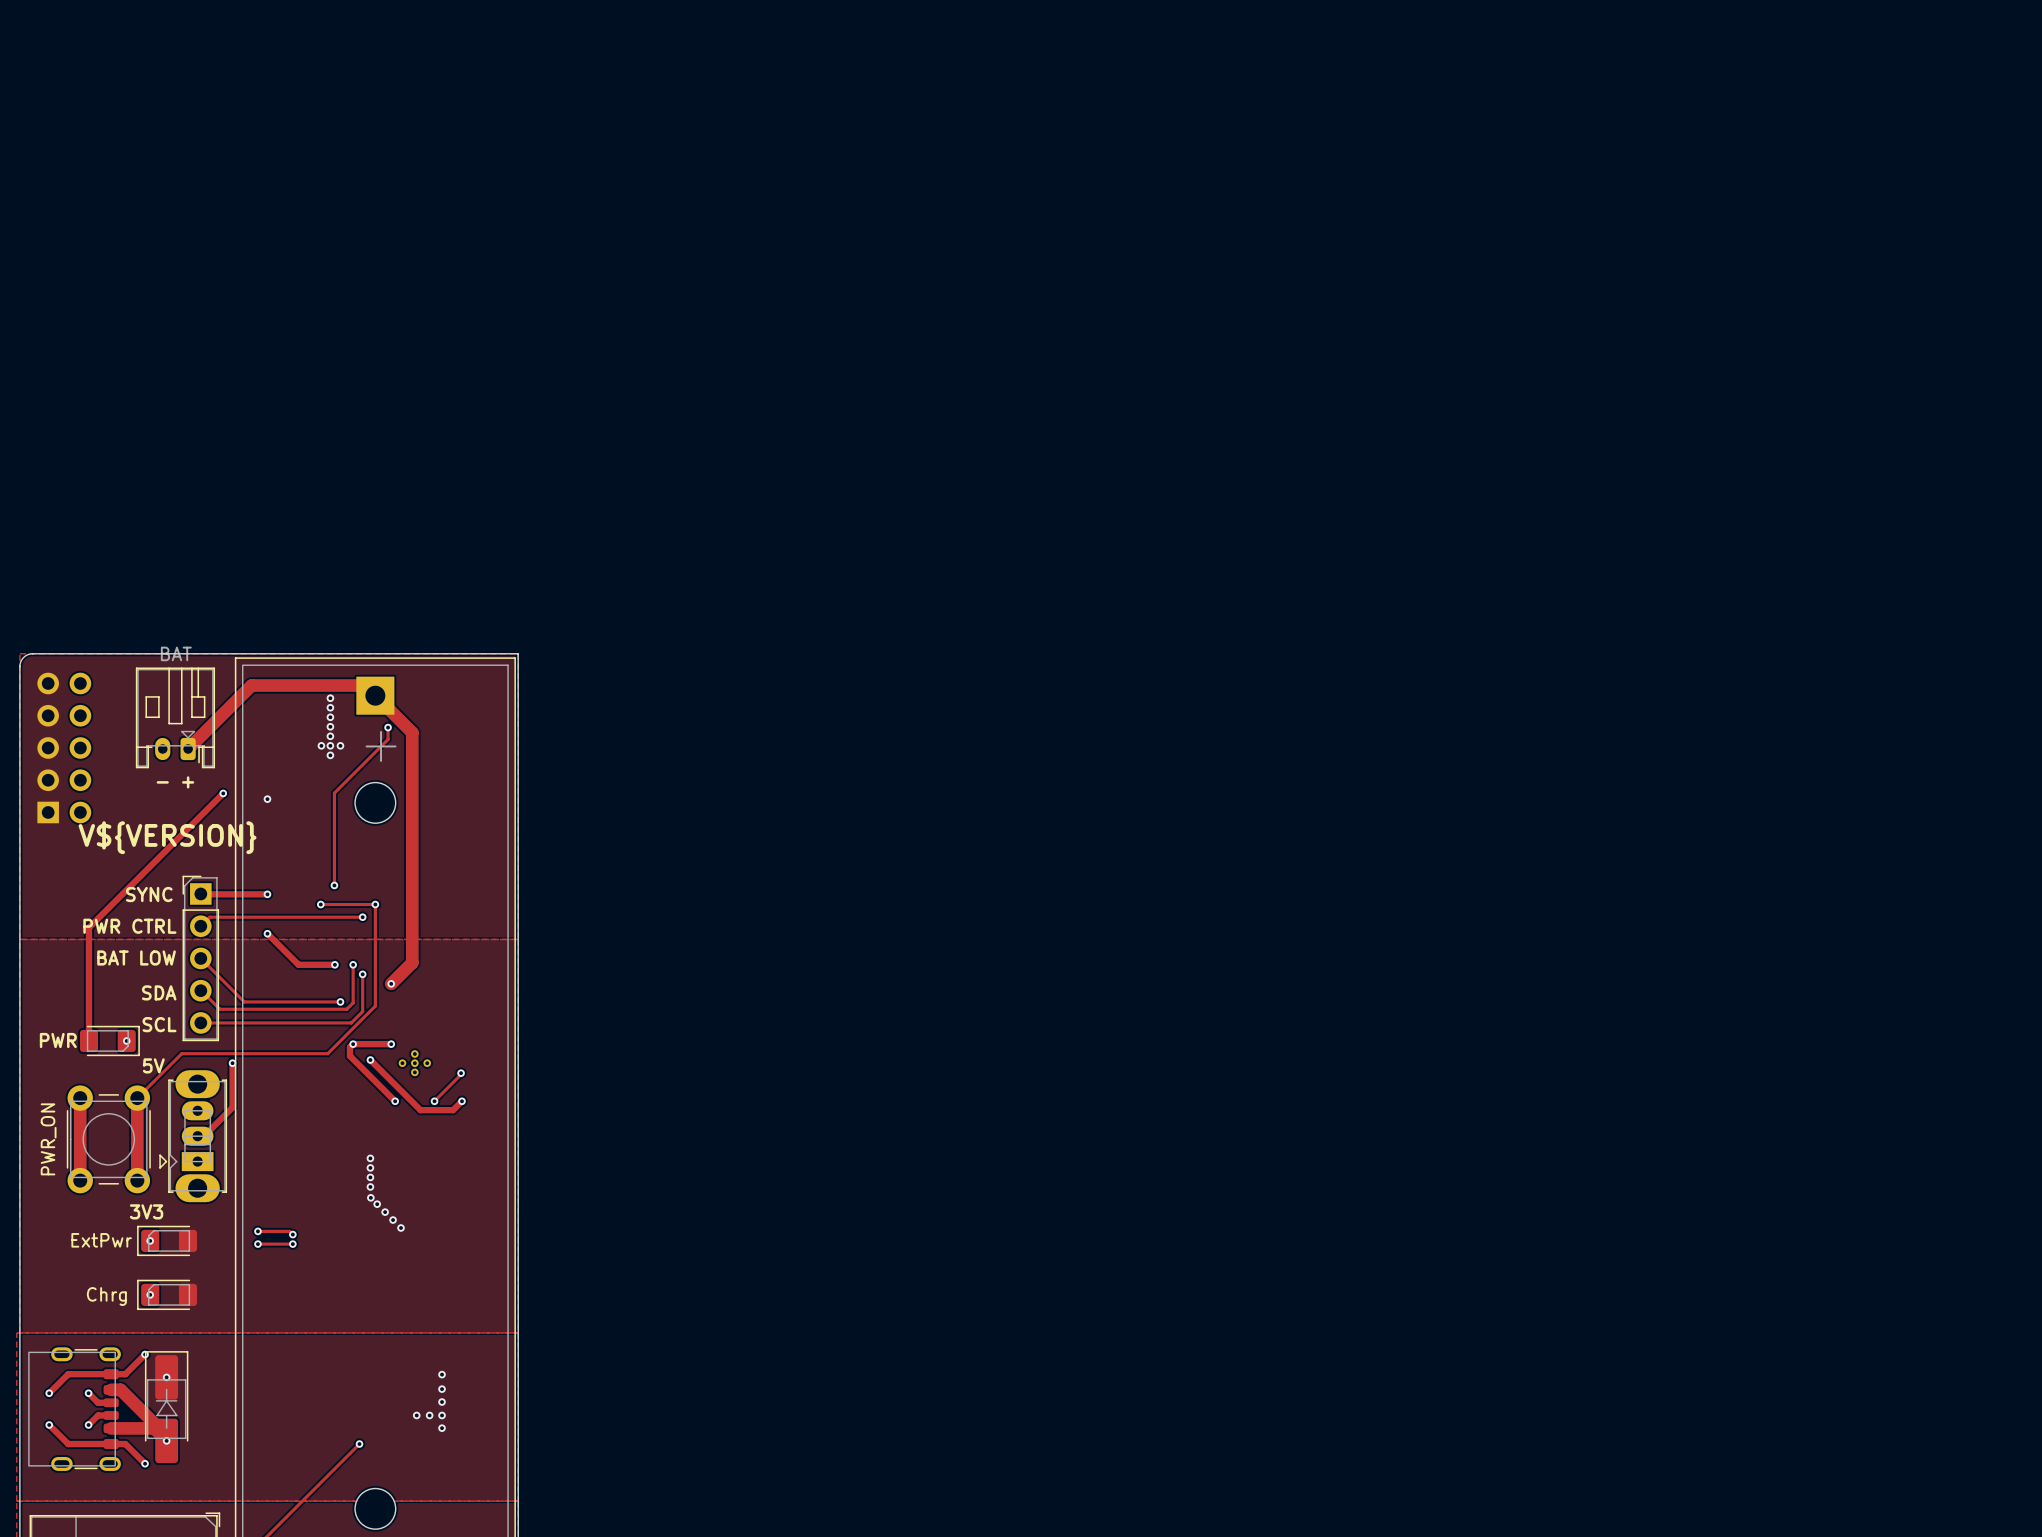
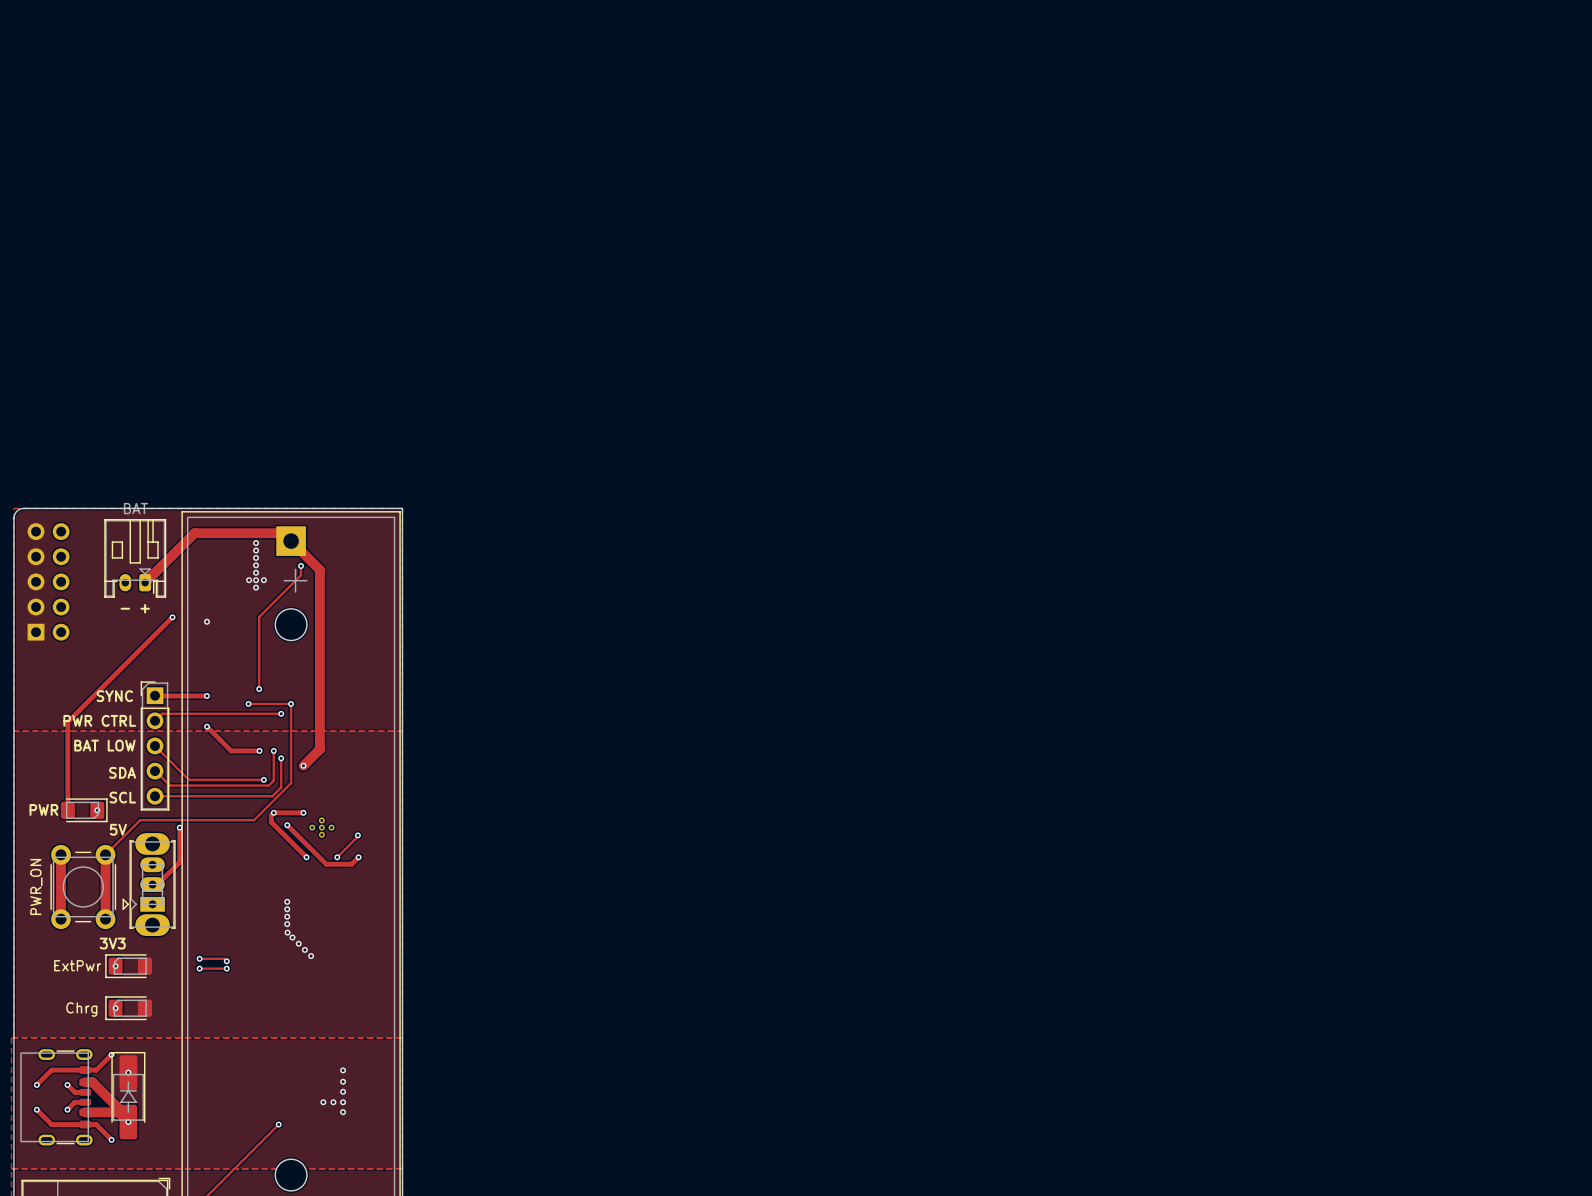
text: V${VERSION} (167, 837) -> none

